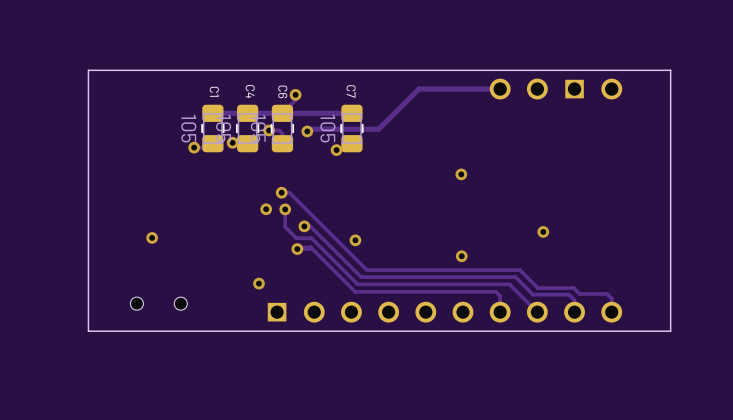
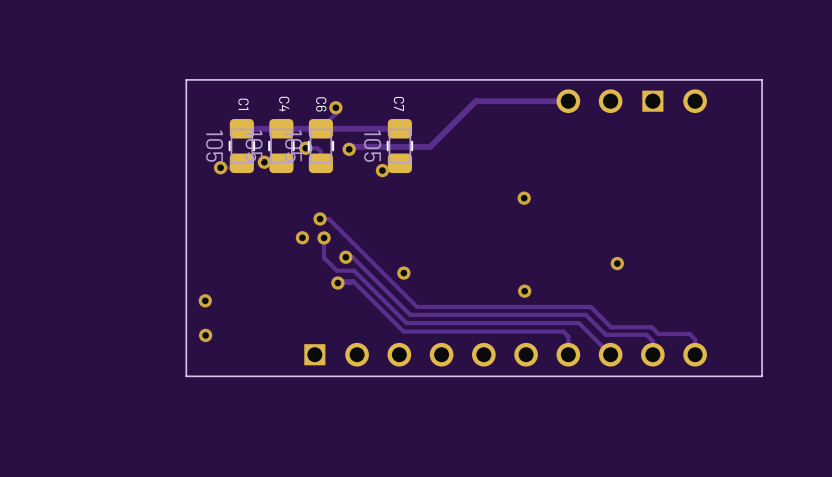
board edge: (163, 70) (88, 70) (88, 331) (163, 331) -> (186, 79) (186, 376)
via: (152, 237) -> none
via: none -> (205, 300)
via: (258, 283) -> none
via: none -> (205, 335)
part: (158, 303) -> none

